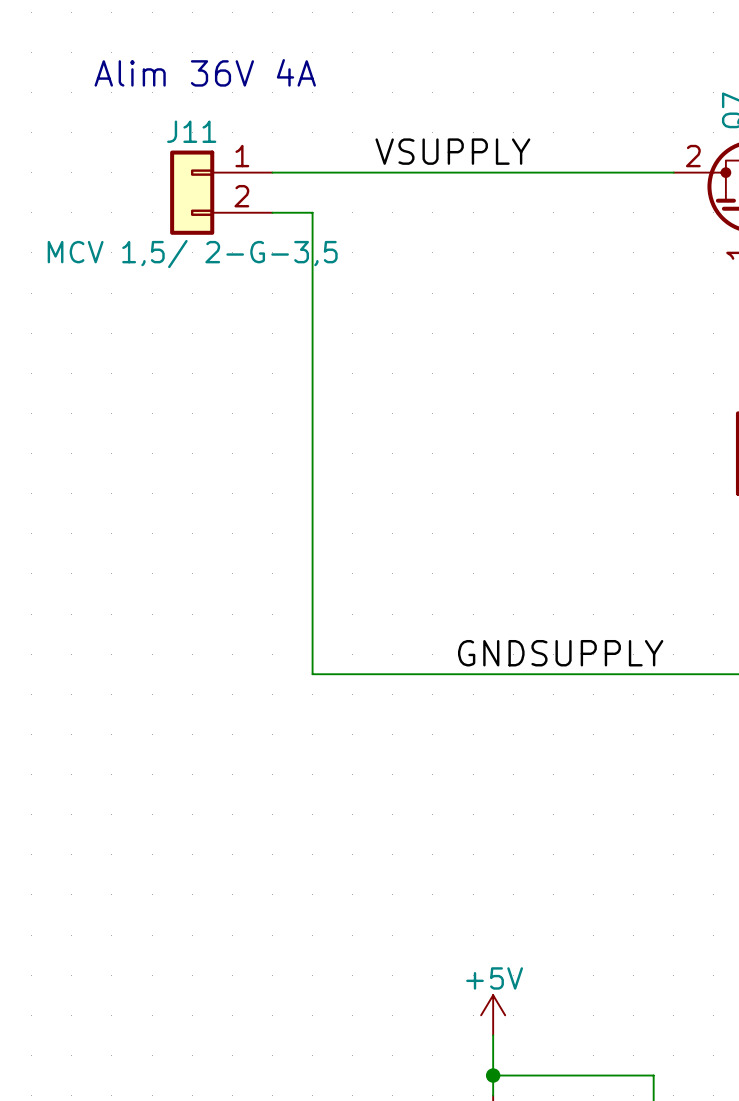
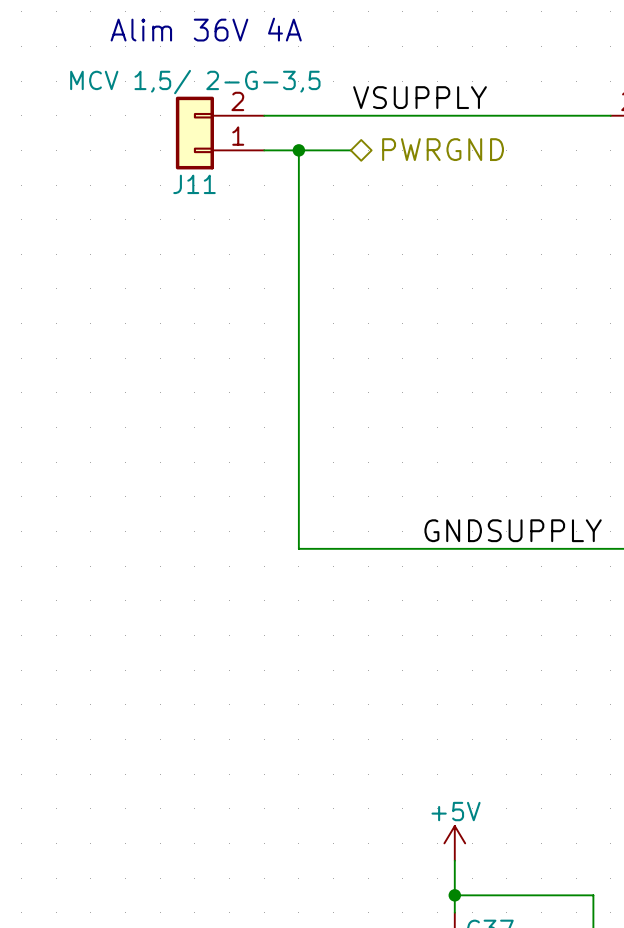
J11 flip: as is (192, 192) -> up-down (194, 133)
hierarchical label: none -> PWRGND (443, 149)
wire: none -> (298, 150) (350, 150)
junction: none -> (298, 150)

